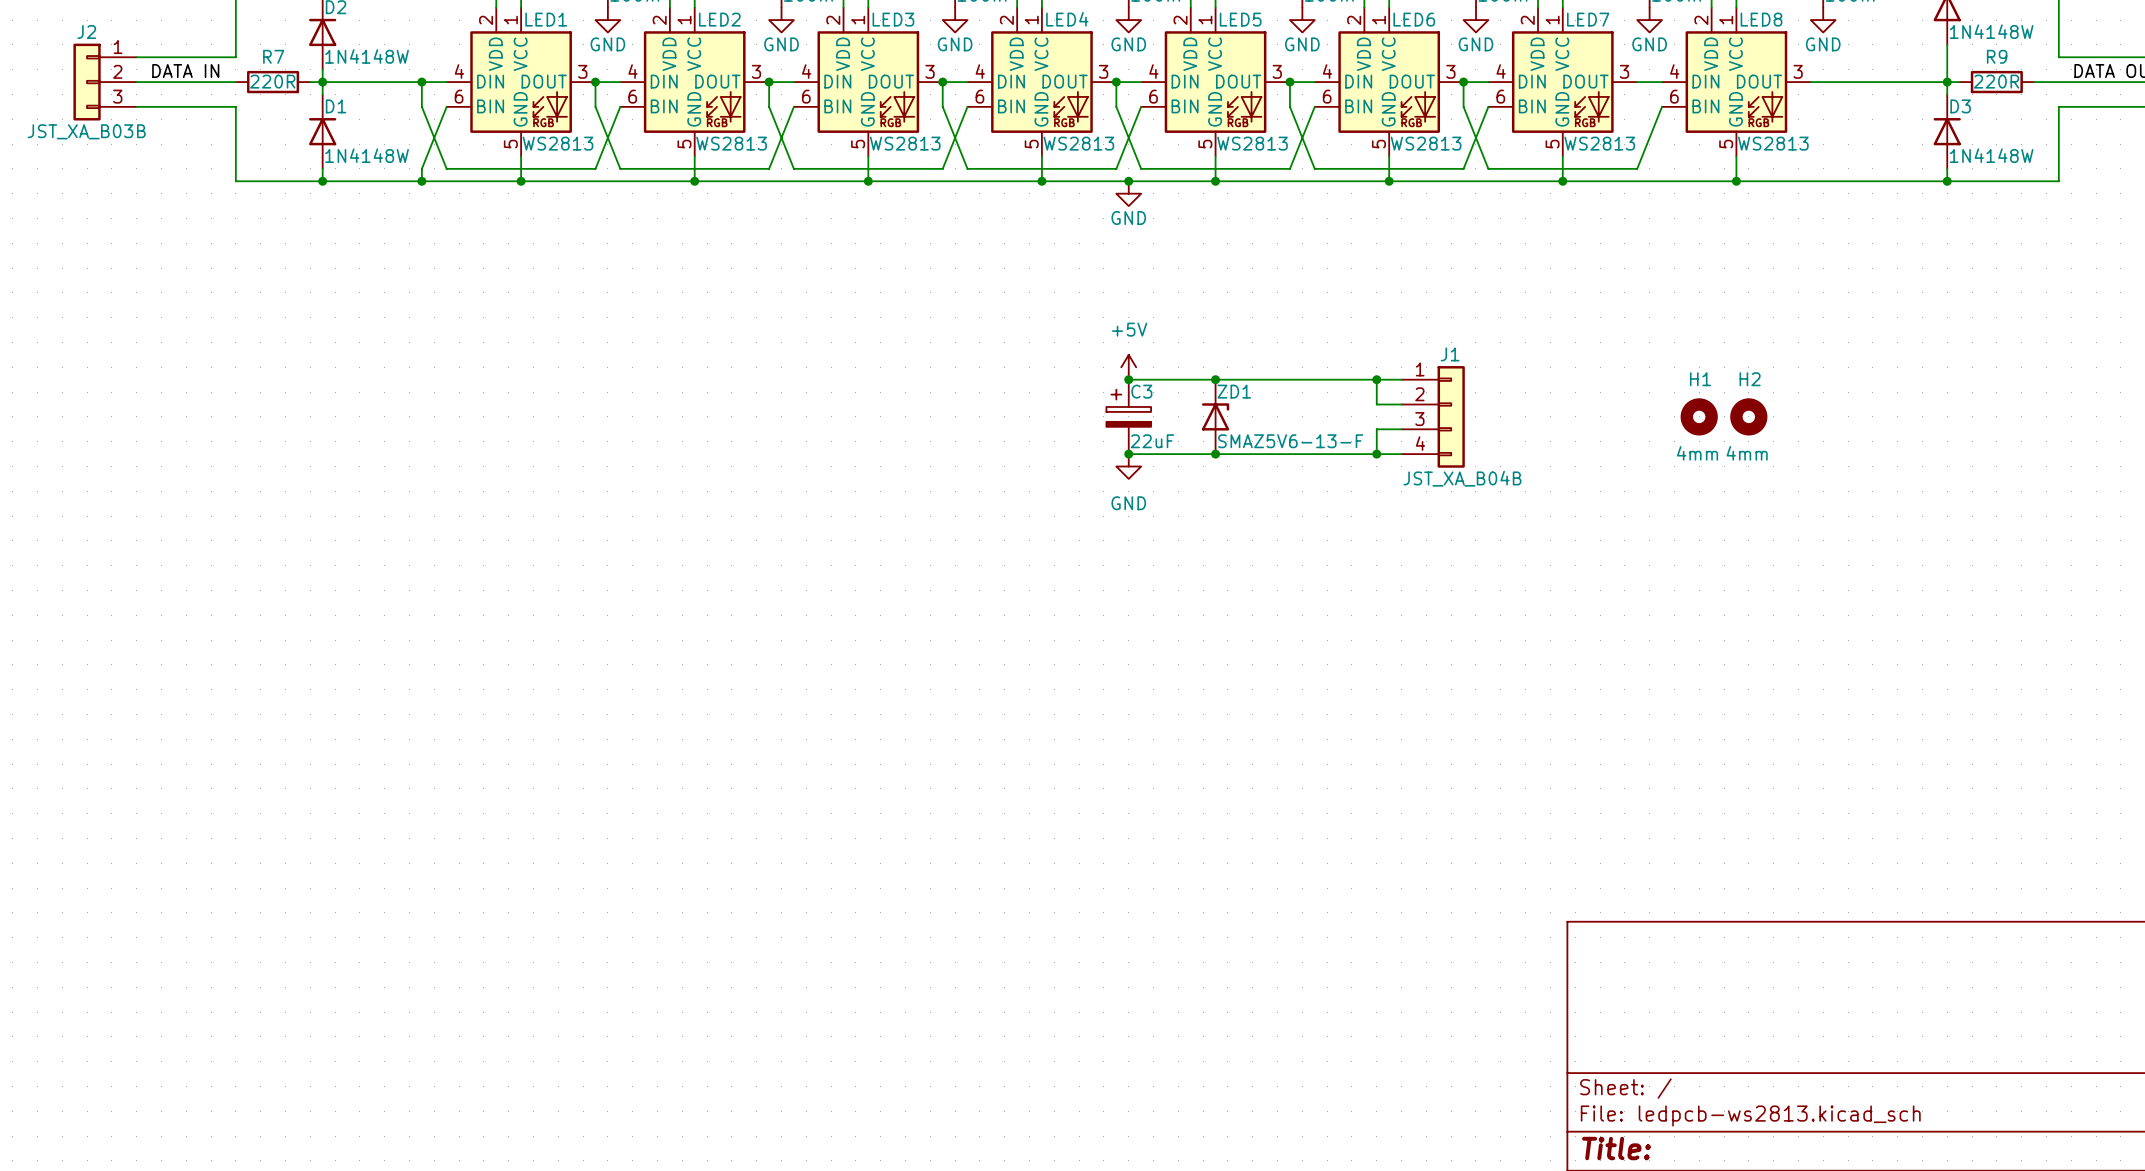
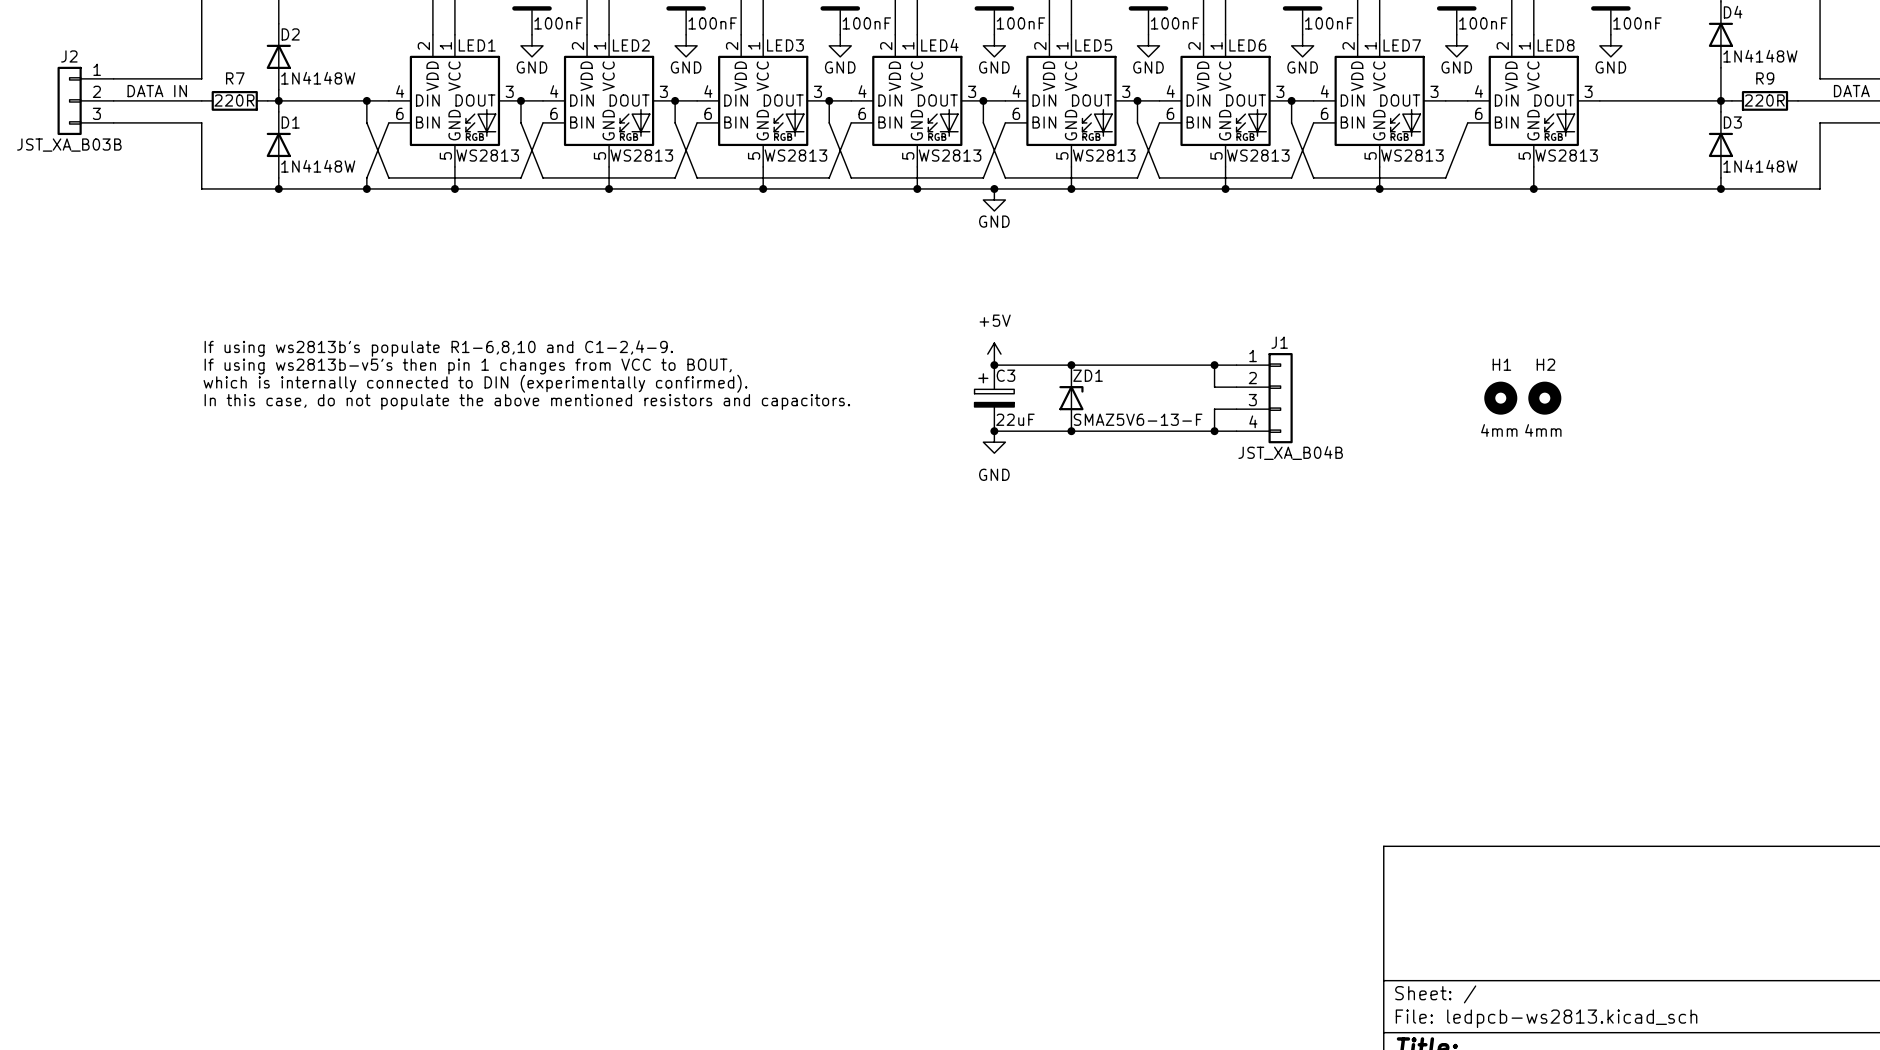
text: none -> If using ws2813b's populate R1-6,8,10 and C1-2,4-9. (438, 348)
text: none -> If using ws2813b-v5's then pin 1 changes from VCC to BOUT, (468, 366)
text: none -> which is internally connected to DIN (experimentally confirmed). (475, 383)
text: none -> In this case, do not populate the above mentioned resistors and capacitors. (527, 401)

